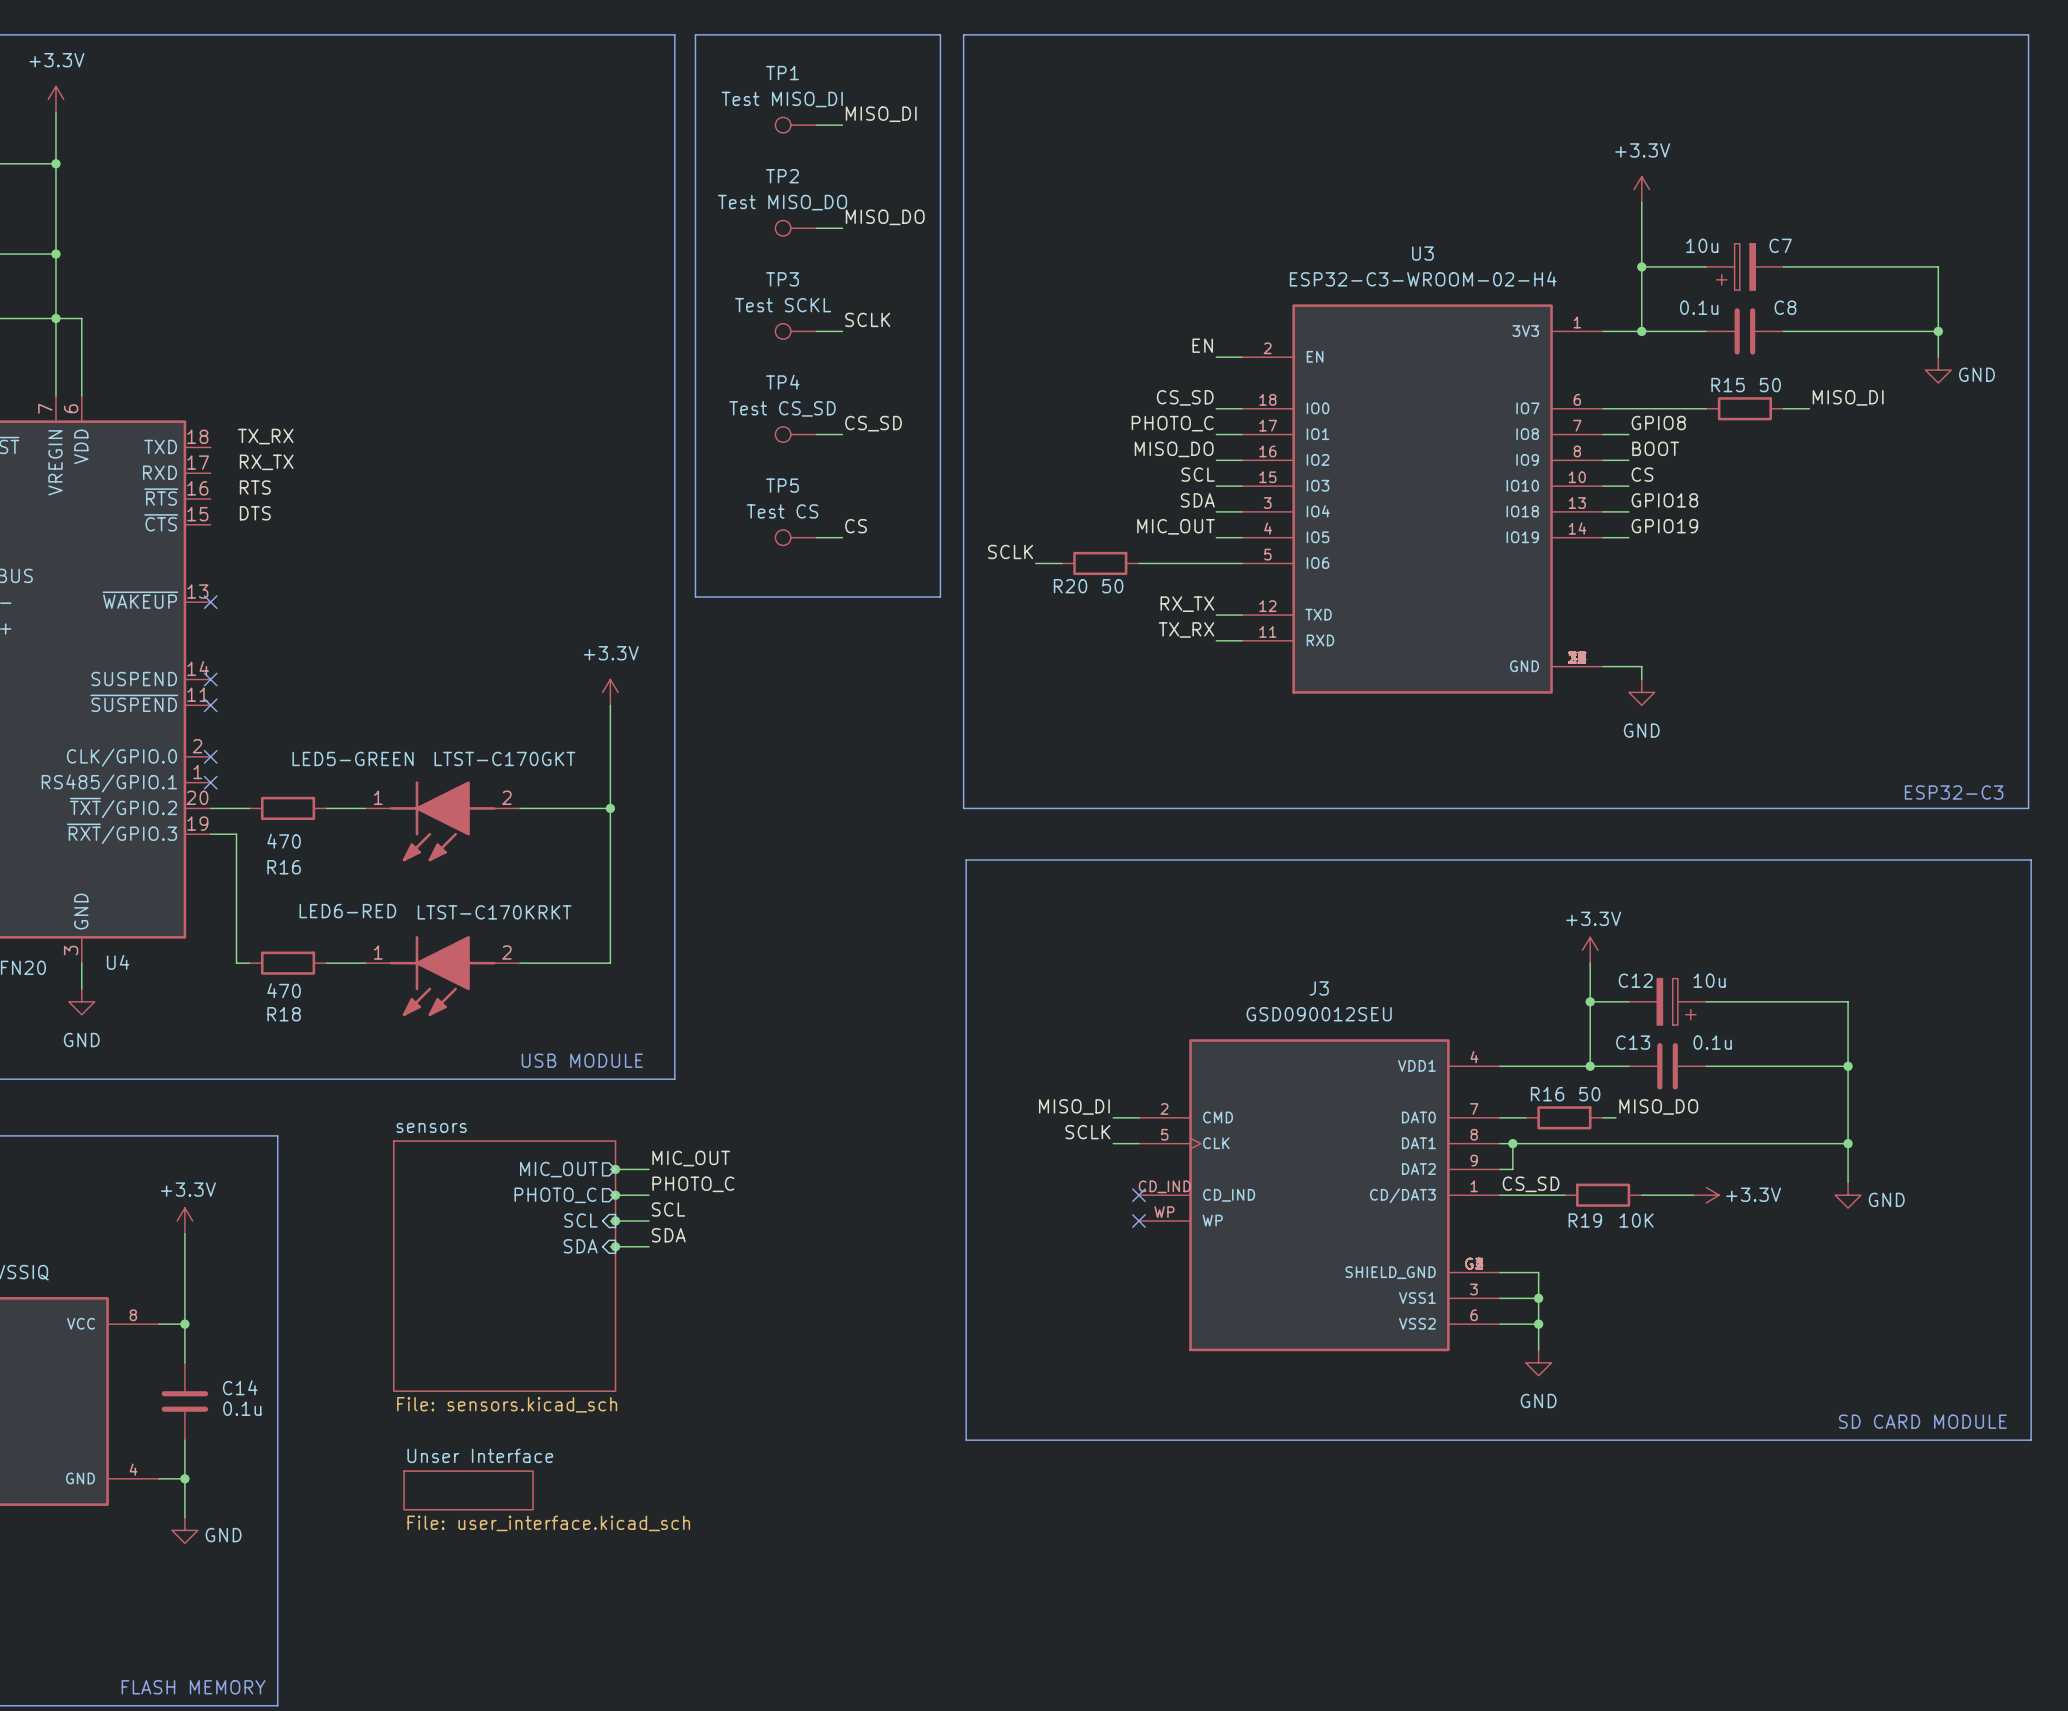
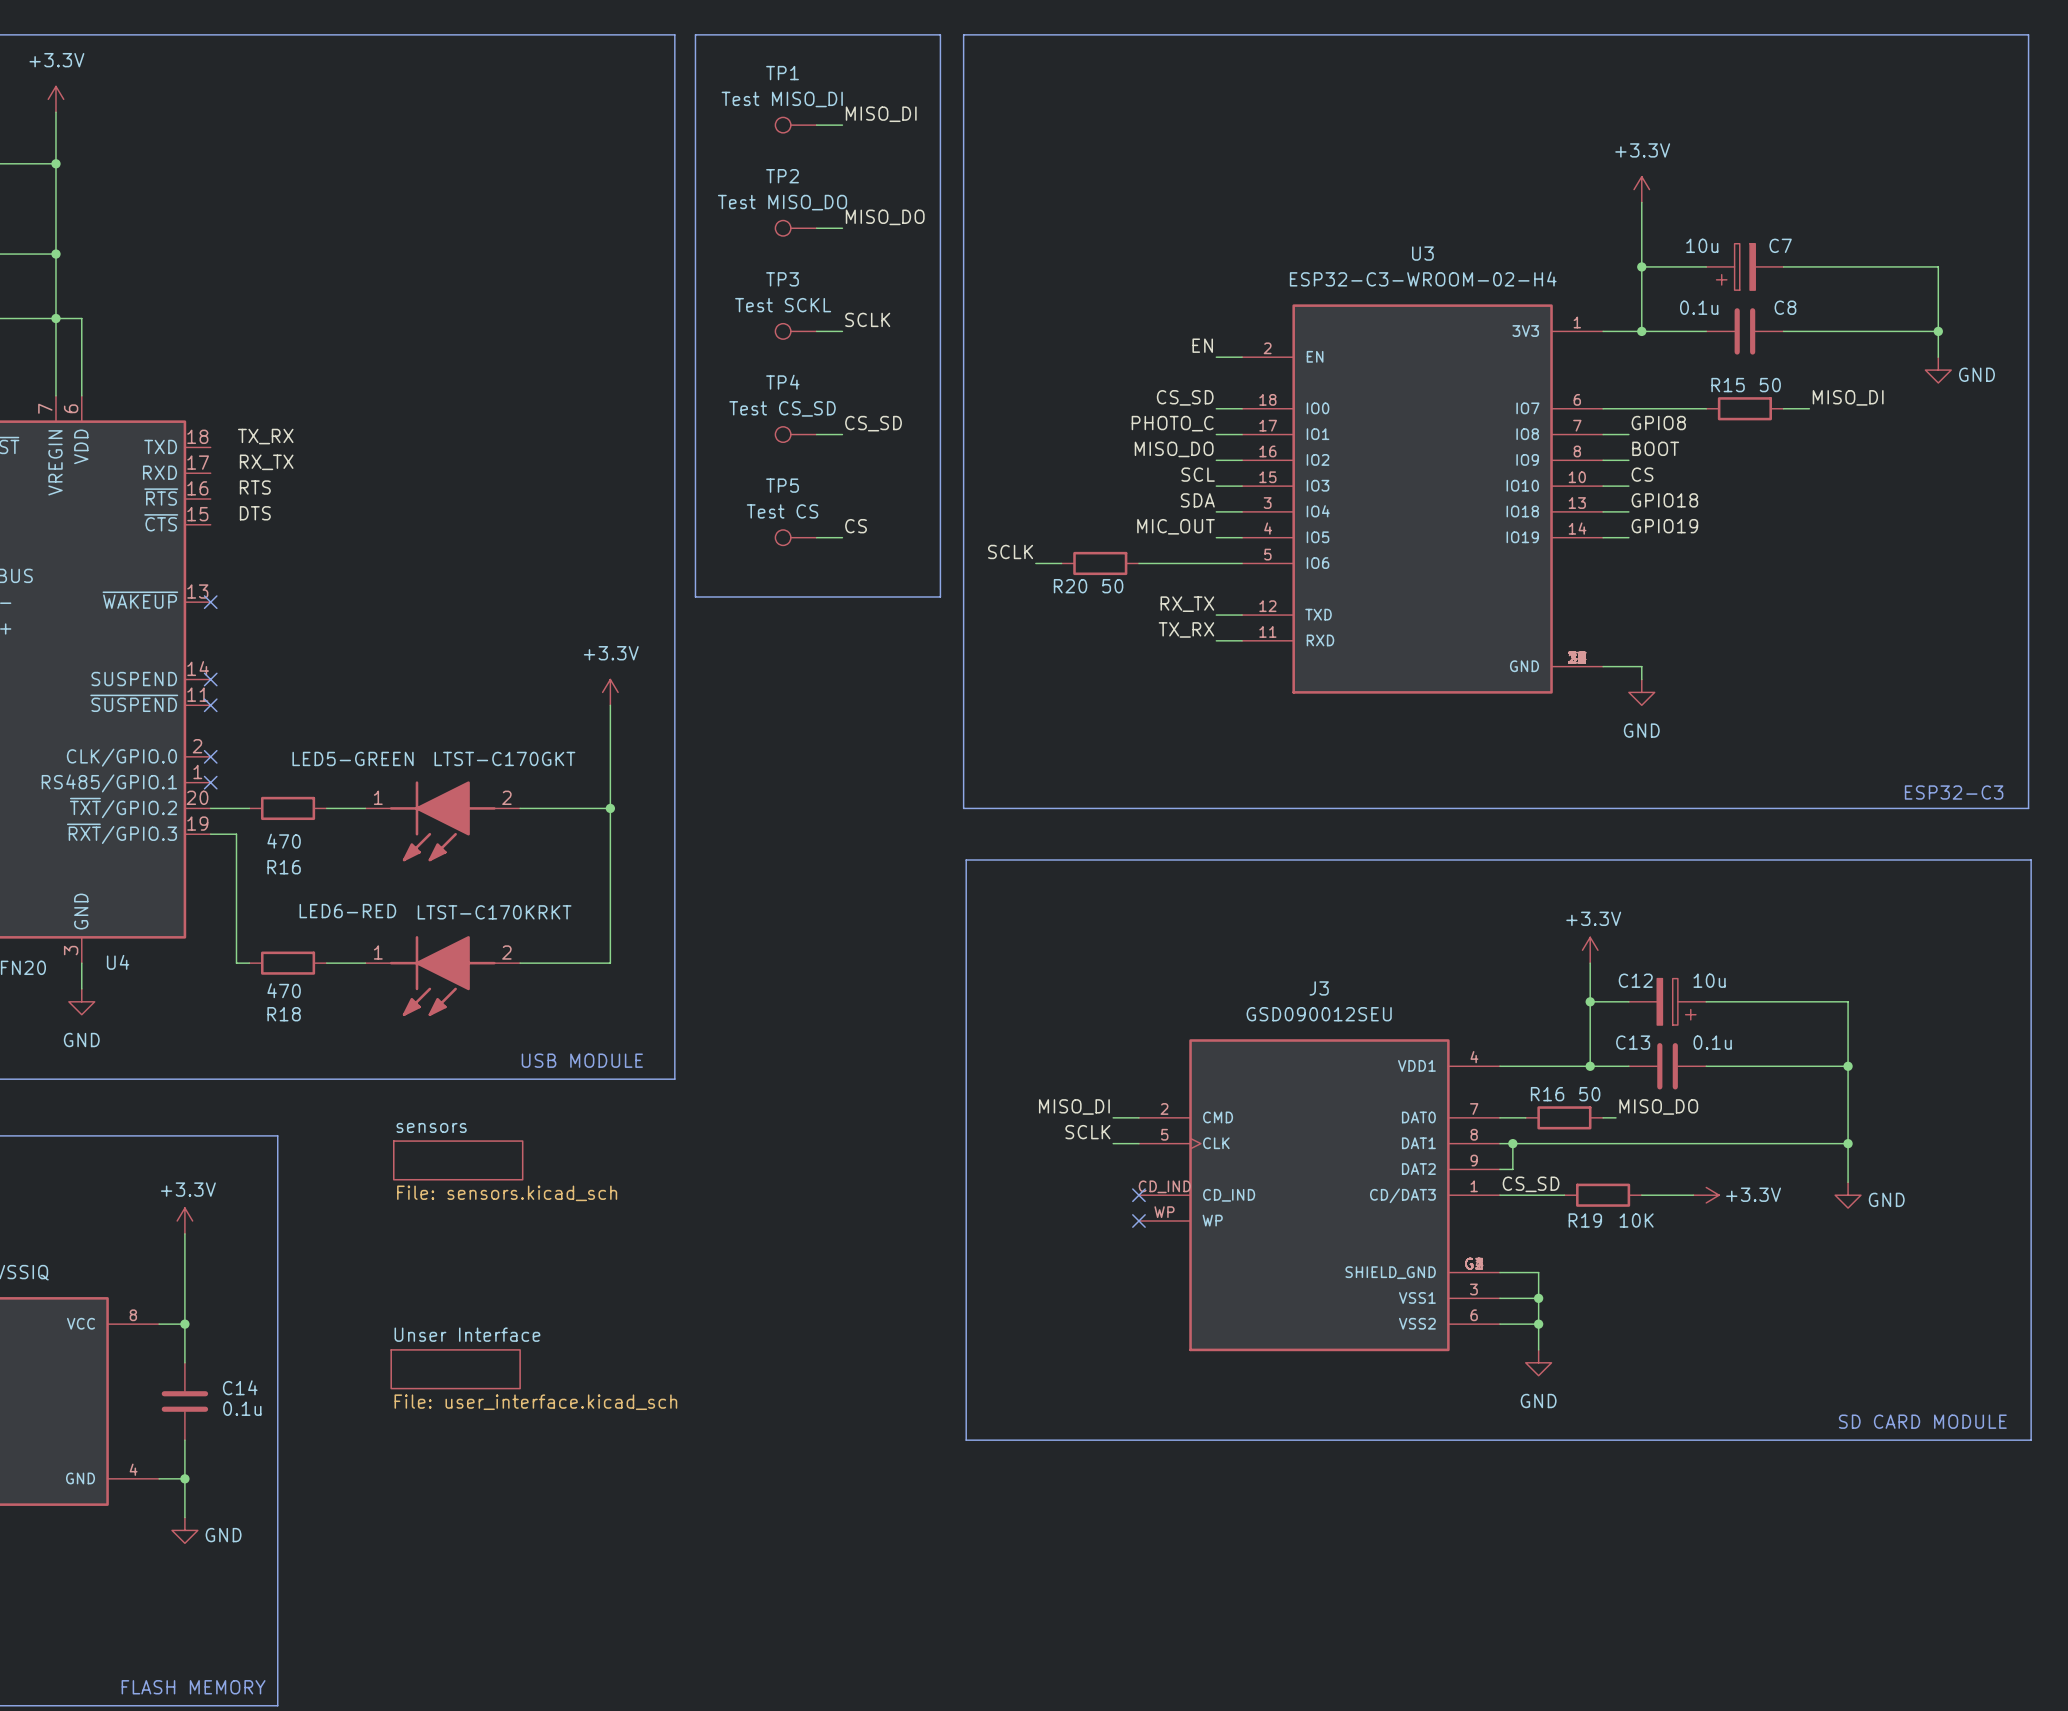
label: MIC_OUT (691, 1158) -> none
sheet sensors: none -> File: sensors.kicad_sch (458, 1160)
sheet pin: MIC_OUT (558, 1169) -> none
wire: (610, 1169) (649, 1169) -> none
junction: (615, 1169) -> none
label: PHOTO_C (693, 1184) -> none
sheet pin: PHOTO_C (555, 1195) -> none
wire: (610, 1195) (649, 1195) -> none
junction: (615, 1195) -> none
label: SCL (668, 1209) -> none
sheet pin: SCL (580, 1220) -> none
wire: (610, 1220) (649, 1220) -> none
junction: (615, 1220) -> none
label: SDA (668, 1235) -> none
sheet pin: SDA (580, 1246) -> none
wire: (610, 1246) (649, 1246) -> none
junction: (615, 1246) -> none
sheet sensors: File: sensors.kicad_sch (504, 1266) -> none
sheet Unser Interface position: (468, 1490) -> (455, 1369)

